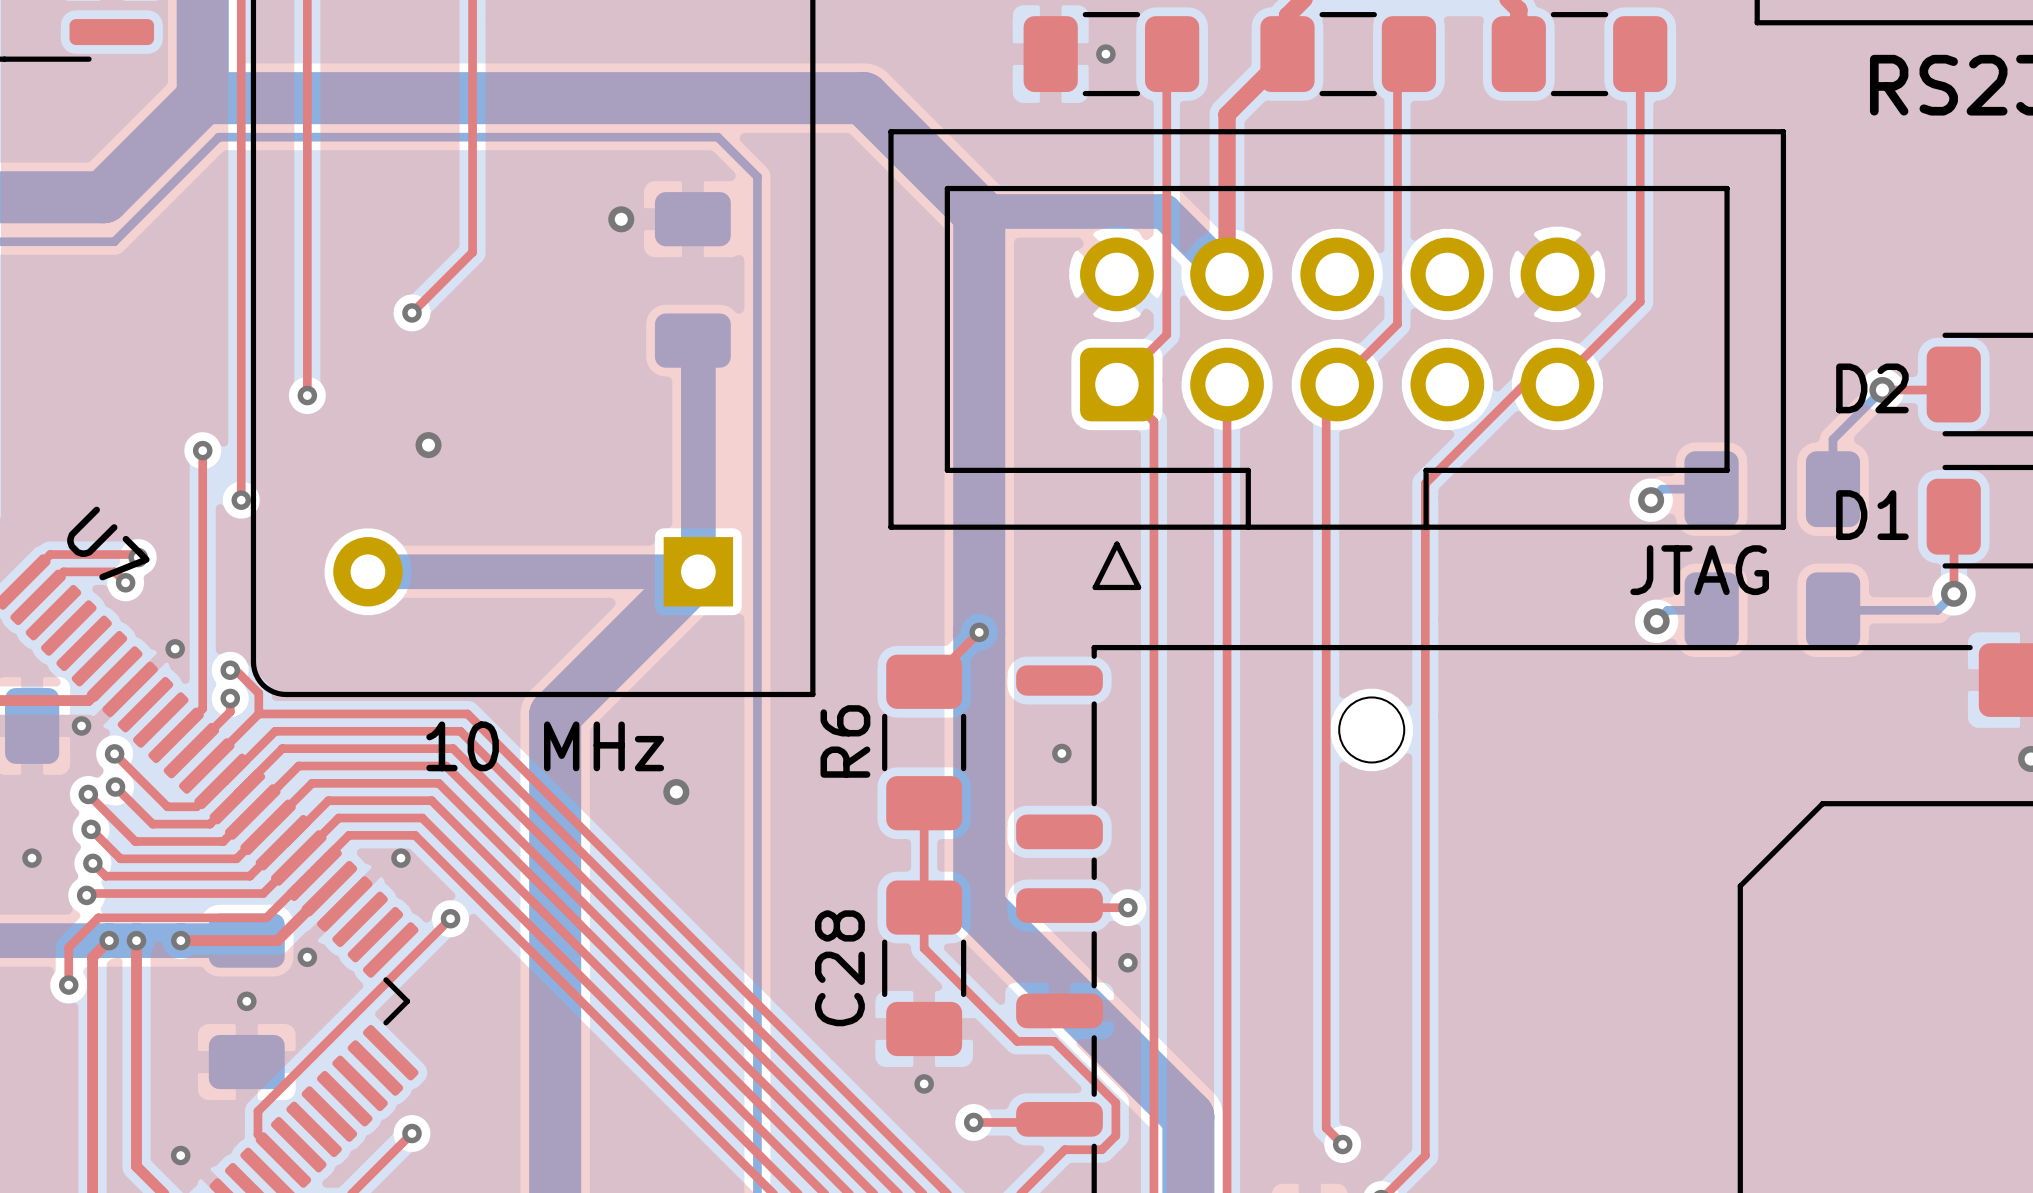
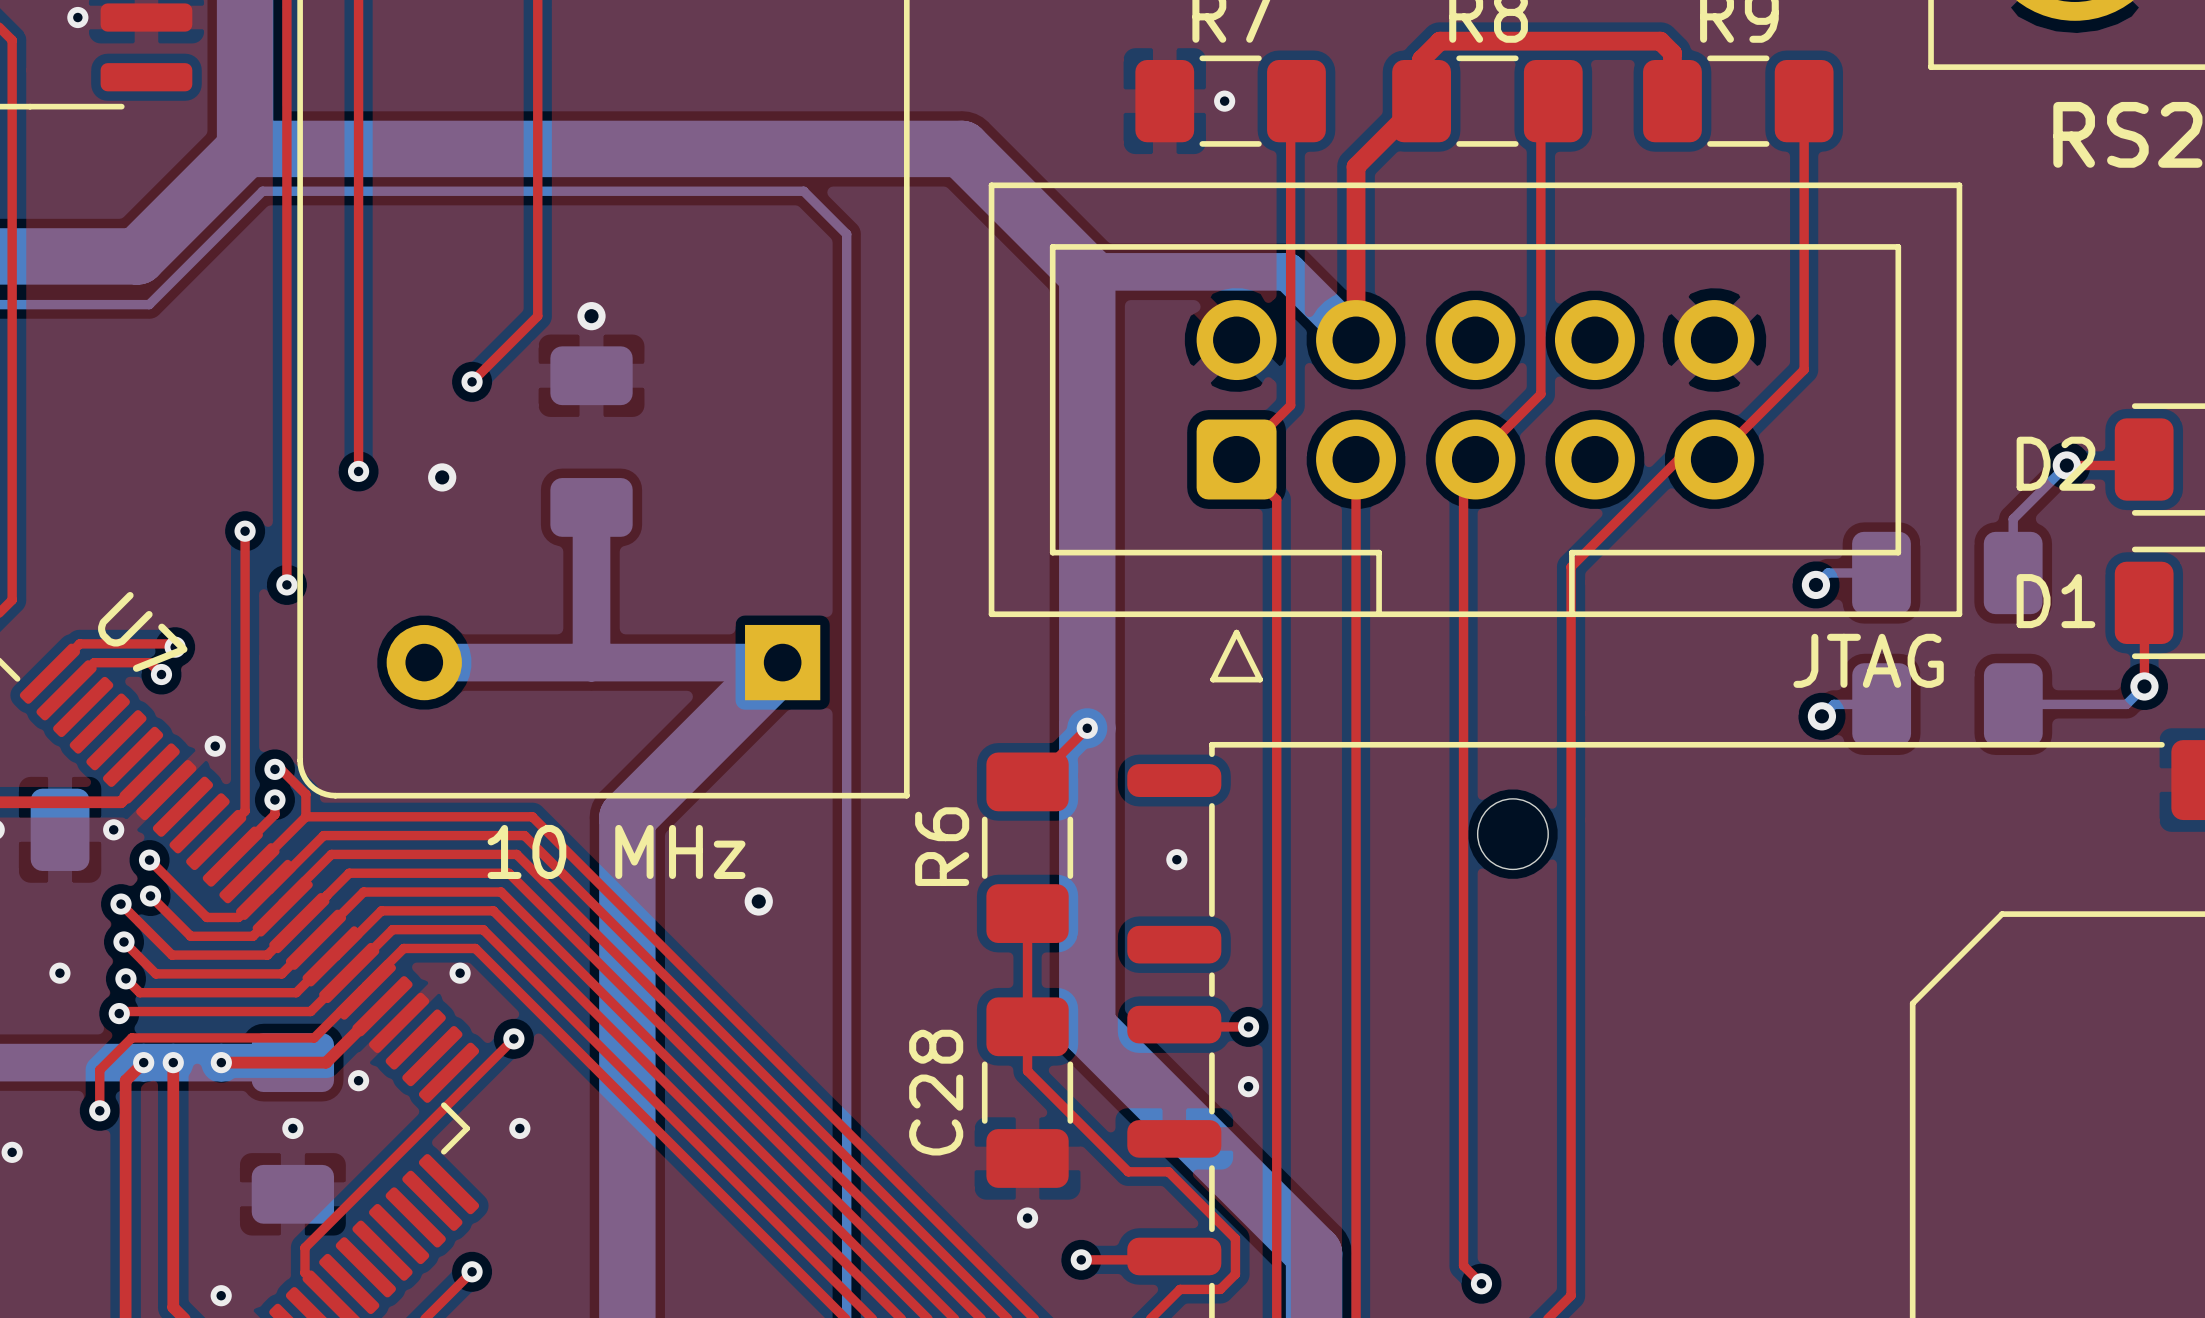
via position: (621, 219) -> (591, 316)
part position: (692, 279) -> (591, 441)
bottom track: (692, 340) (698, 346) (698, 571) -> none
bottom track: none -> (591, 507) (591, 662)
via position: (428, 445) -> (442, 477)
via: none -> (519, 1128)

